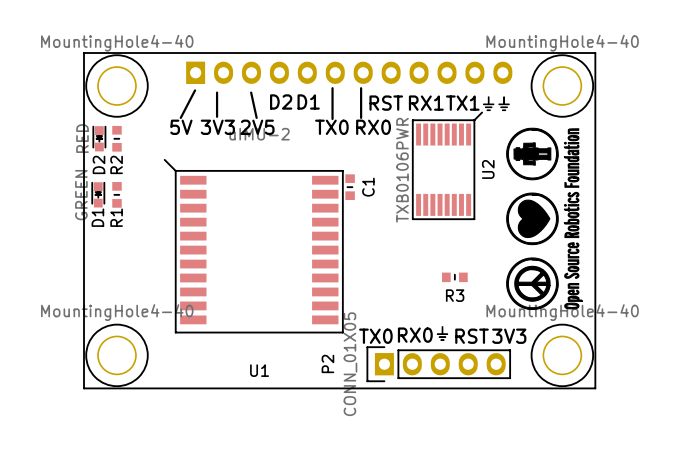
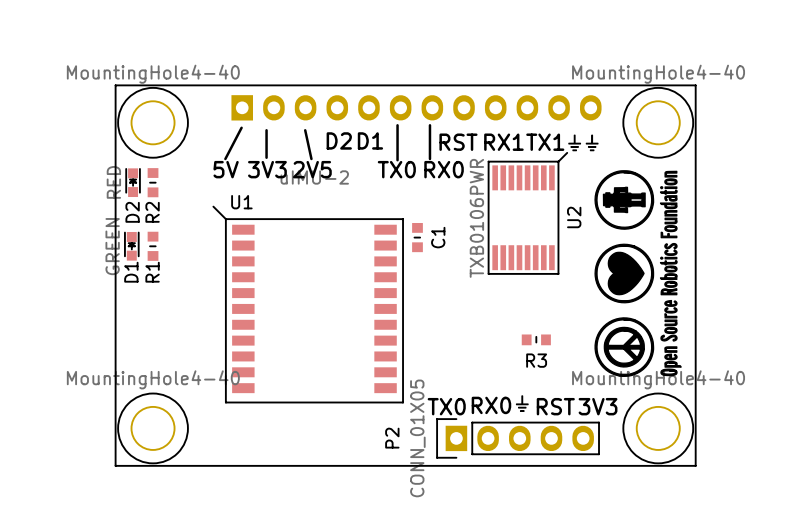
U1 footprint: [163, 159, 344, 334] -> [212, 205, 404, 404]
U1 name position: U1 (259, 370) -> U1 (241, 202)

